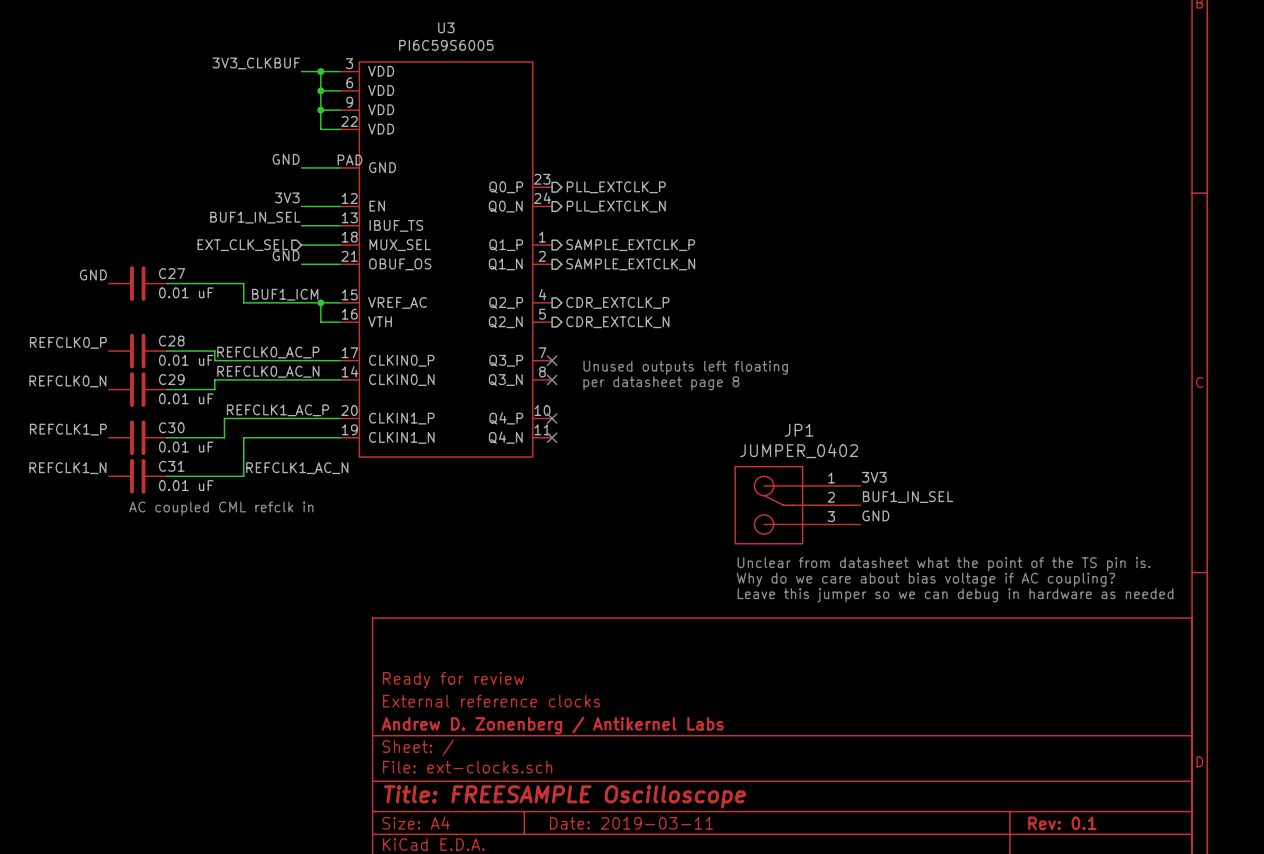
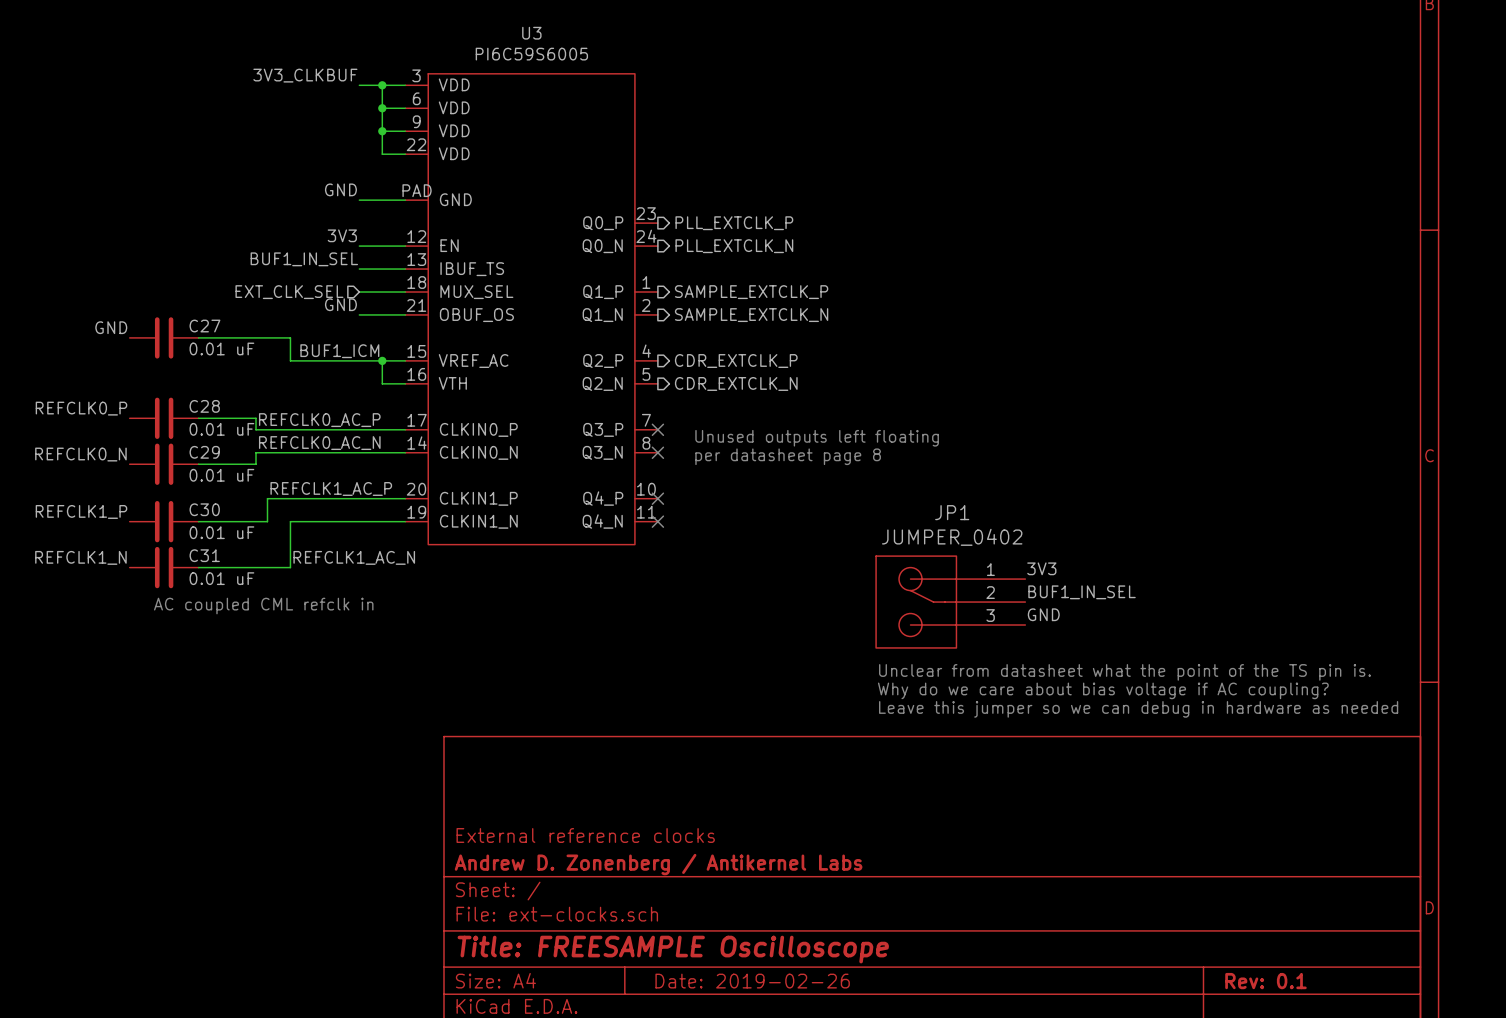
title block: Ready for review (453, 680) -> none
title block: Date: 2019-03-11 (631, 823) -> Date: 2019-02-26 (752, 981)

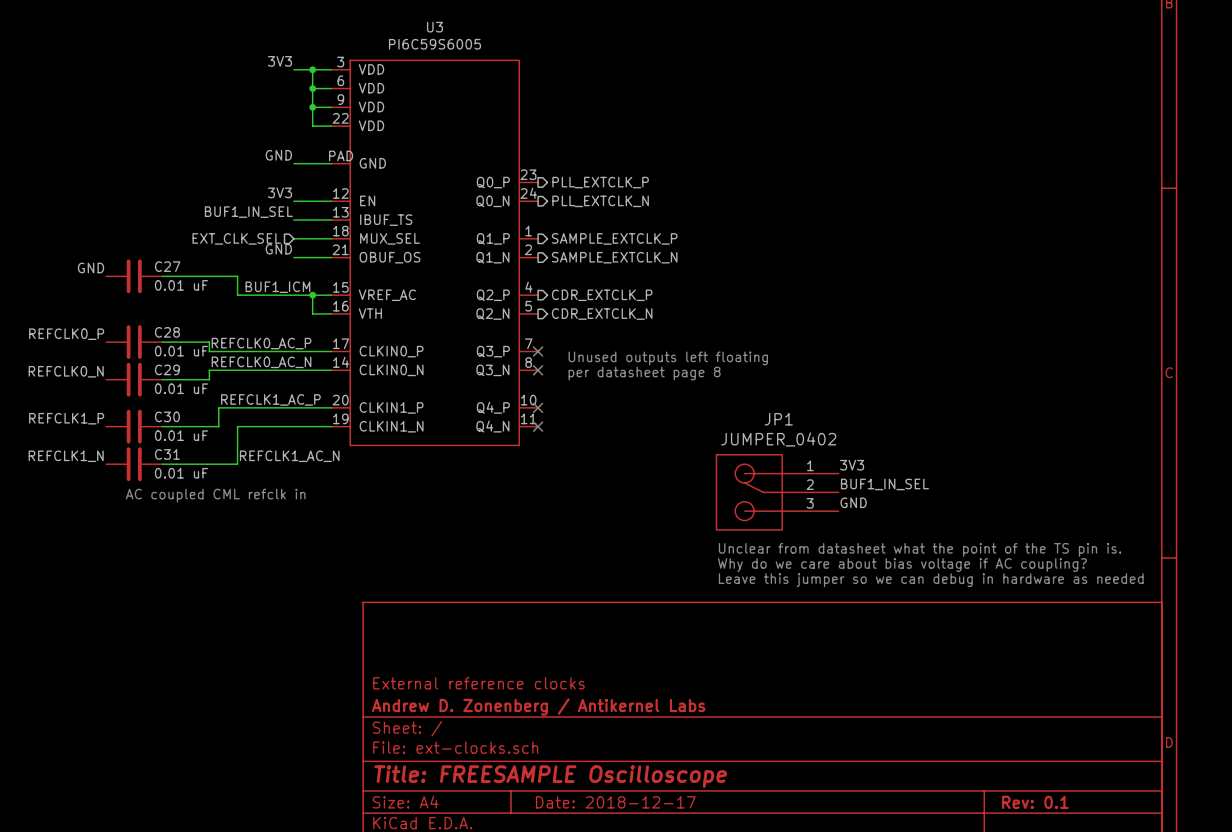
label: 3V3_CLKBUF (305, 75) -> 3V3 (279, 61)
title block: Date: 2019-02-26 (752, 981) -> Date: 2018-12-17 (615, 802)

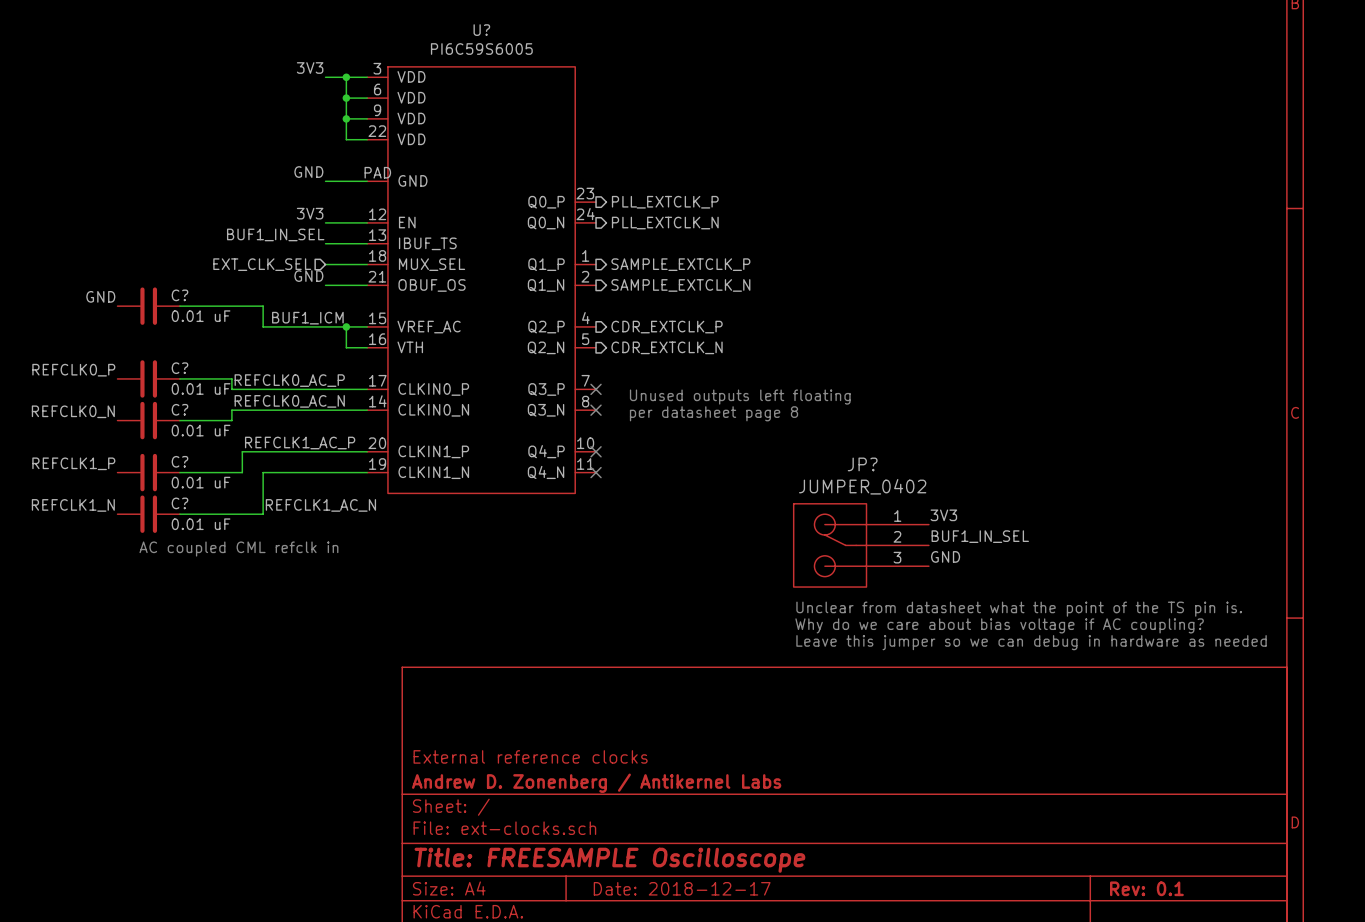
U3 name: U3 (434, 27) -> U? (481, 30)
C27 name: C27 (167, 266) -> C? (179, 295)
C28 name: C28 (167, 332) -> C? (179, 368)
C29 name: C29 (167, 369) -> C? (179, 409)
C30 name: C30 (167, 416) -> C? (179, 461)
JP1 name: JP1 (778, 419) -> JP? (862, 464)
C31 name: C31 (167, 454) -> C? (179, 503)

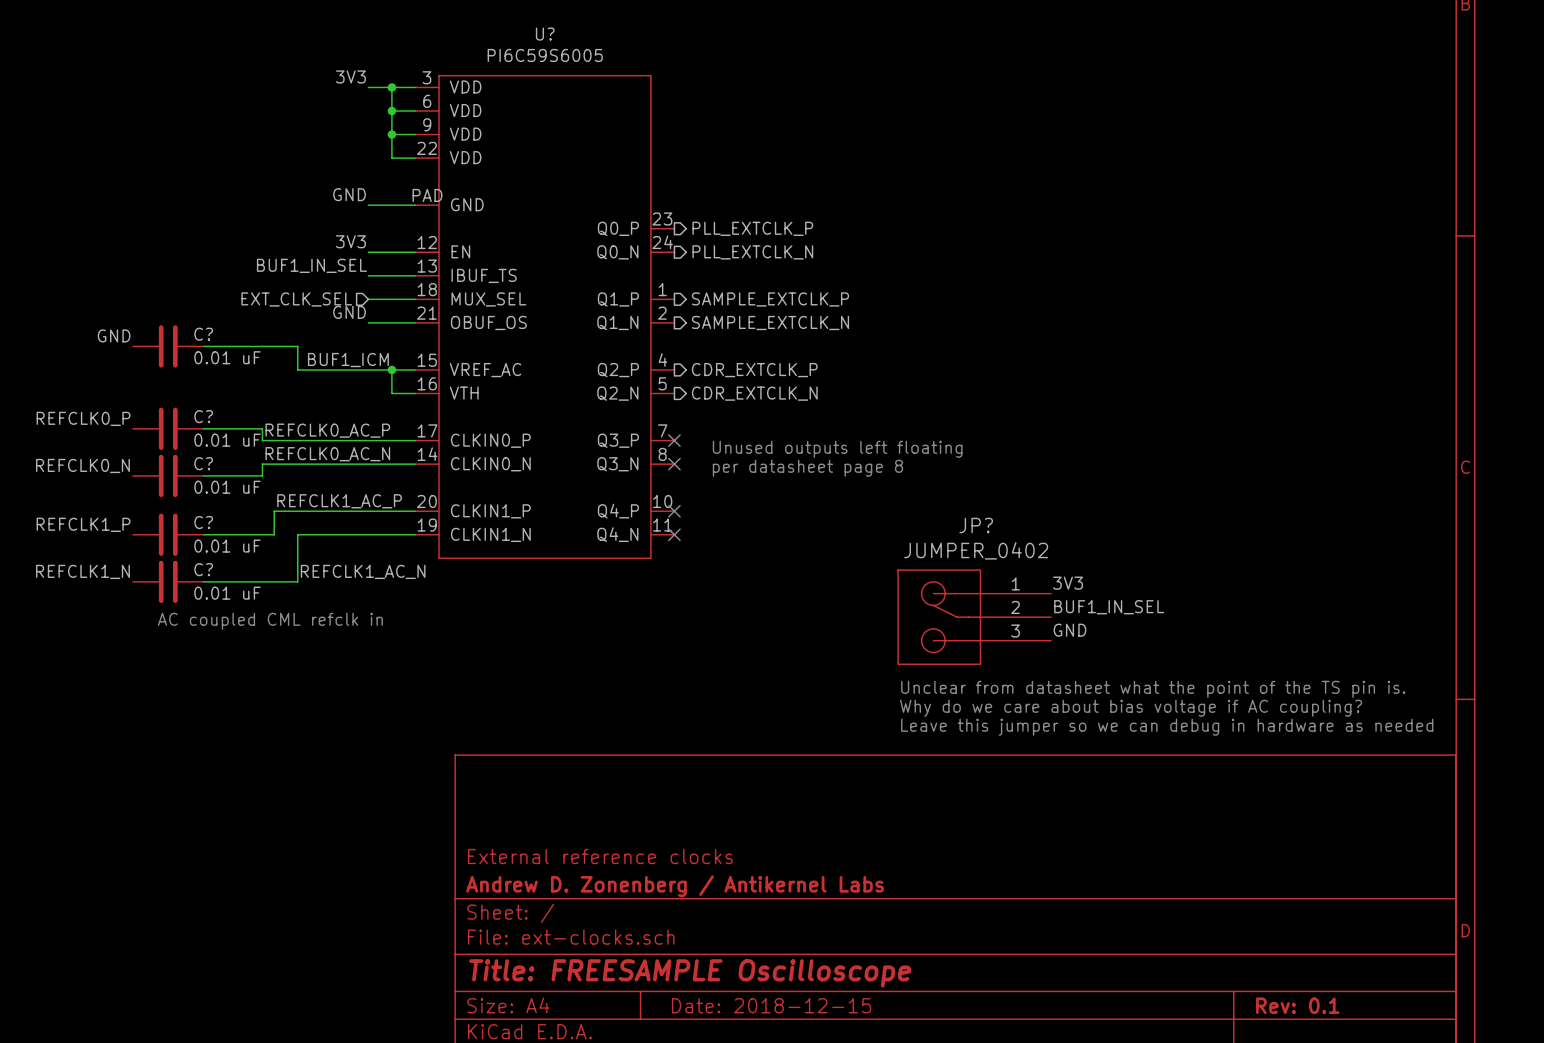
title block: Date: 2018-12-17 (682, 888) -> Date: 2018-12-15 (771, 1005)

